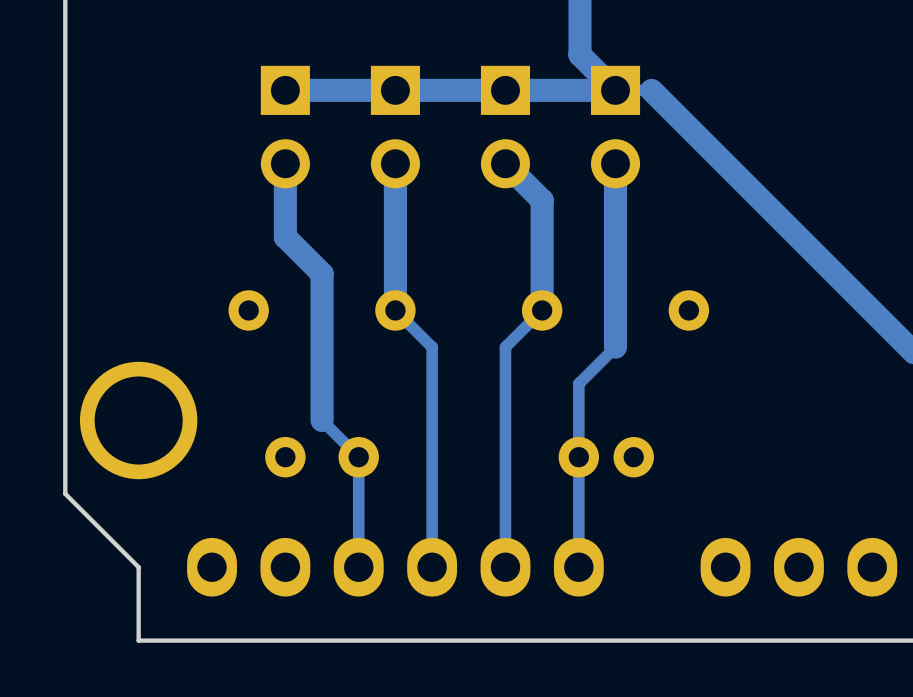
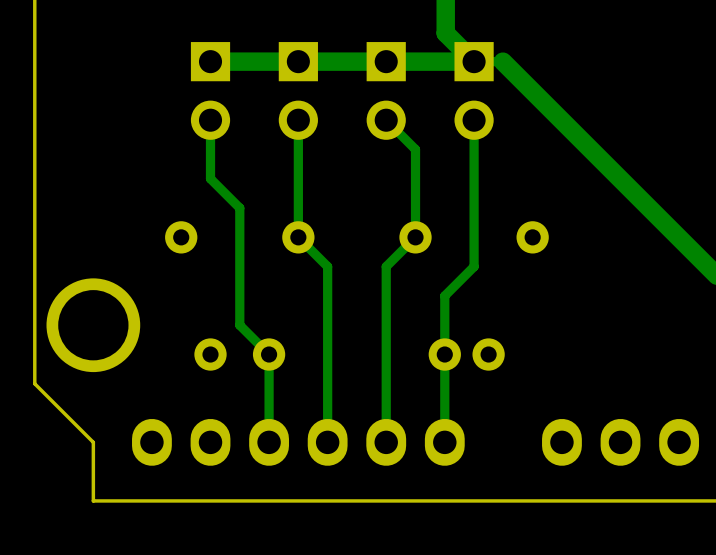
bottom track width: thick (285, 163) (285, 237) (322, 273) (322, 420) -> thin (210, 120) (210, 178) (239, 208) (239, 325)
bottom track width: thick (395, 163) (395, 310) -> thin (298, 120) (298, 237)
bottom track width: thick (505, 163) (542, 200) (542, 310) -> thin (386, 120) (415, 149) (415, 237)
bottom track width: thick (615, 163) (615, 347) -> thin (474, 120) (474, 266)

